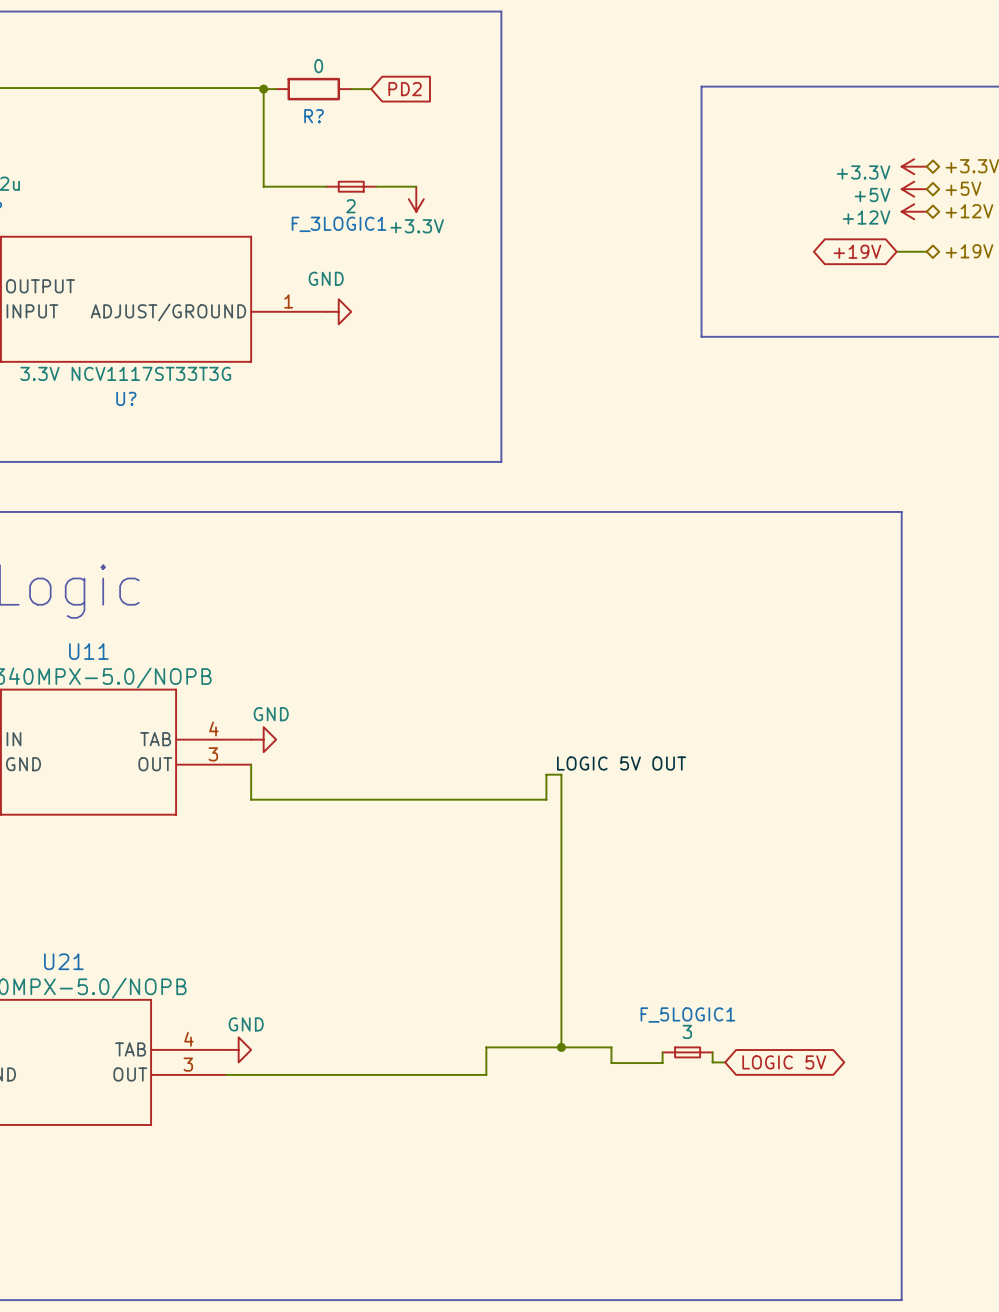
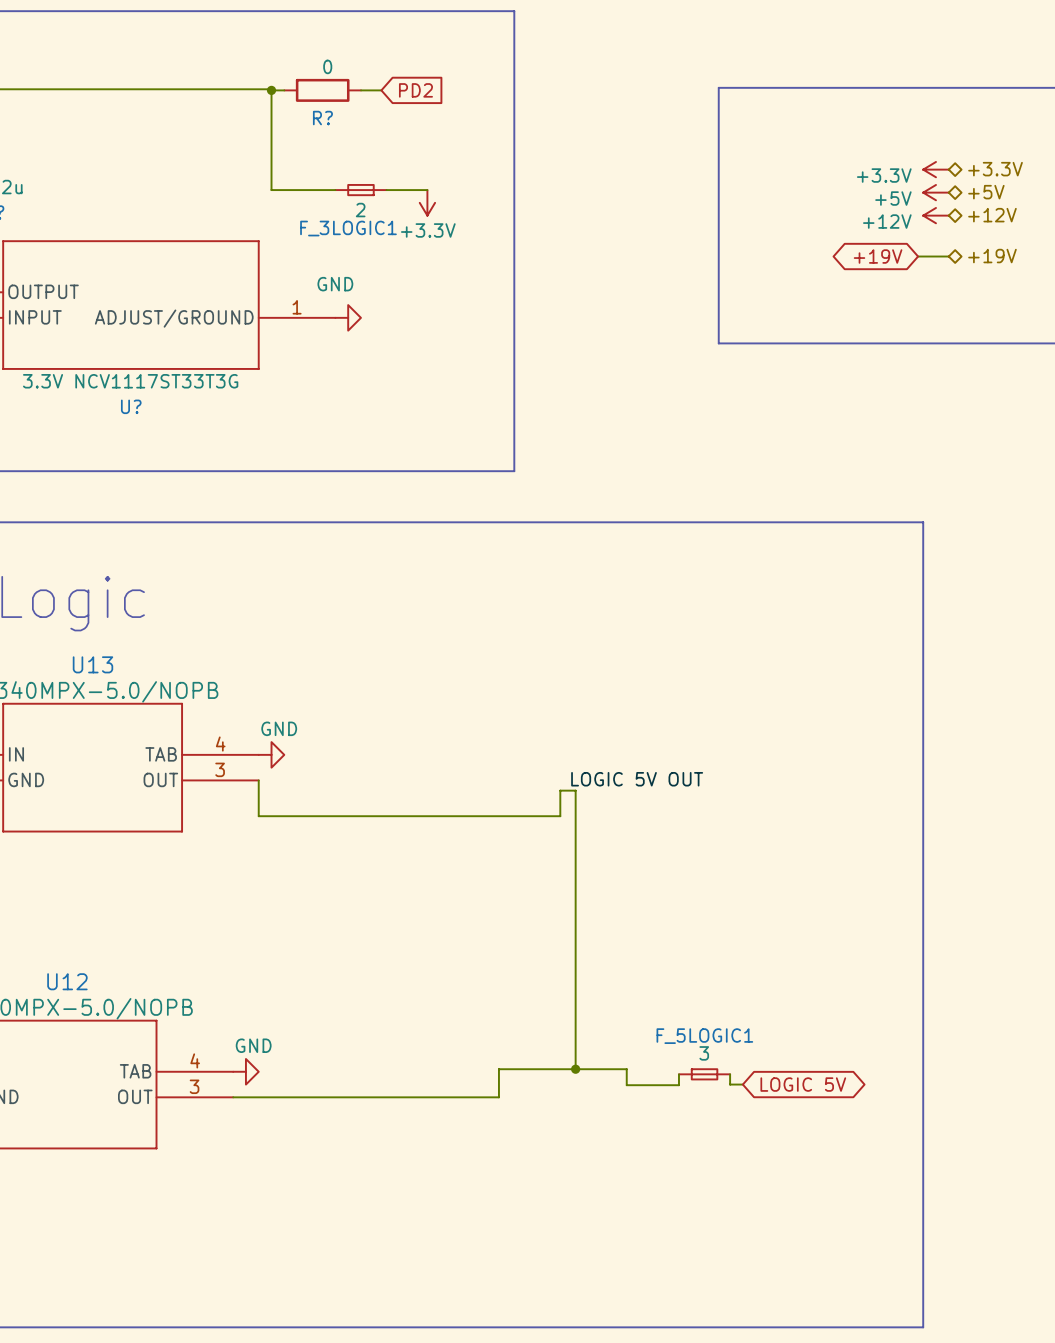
U11 name: U11 (88, 651) -> U13 (92, 664)
U21 name: U21 (63, 961) -> U12 (67, 981)

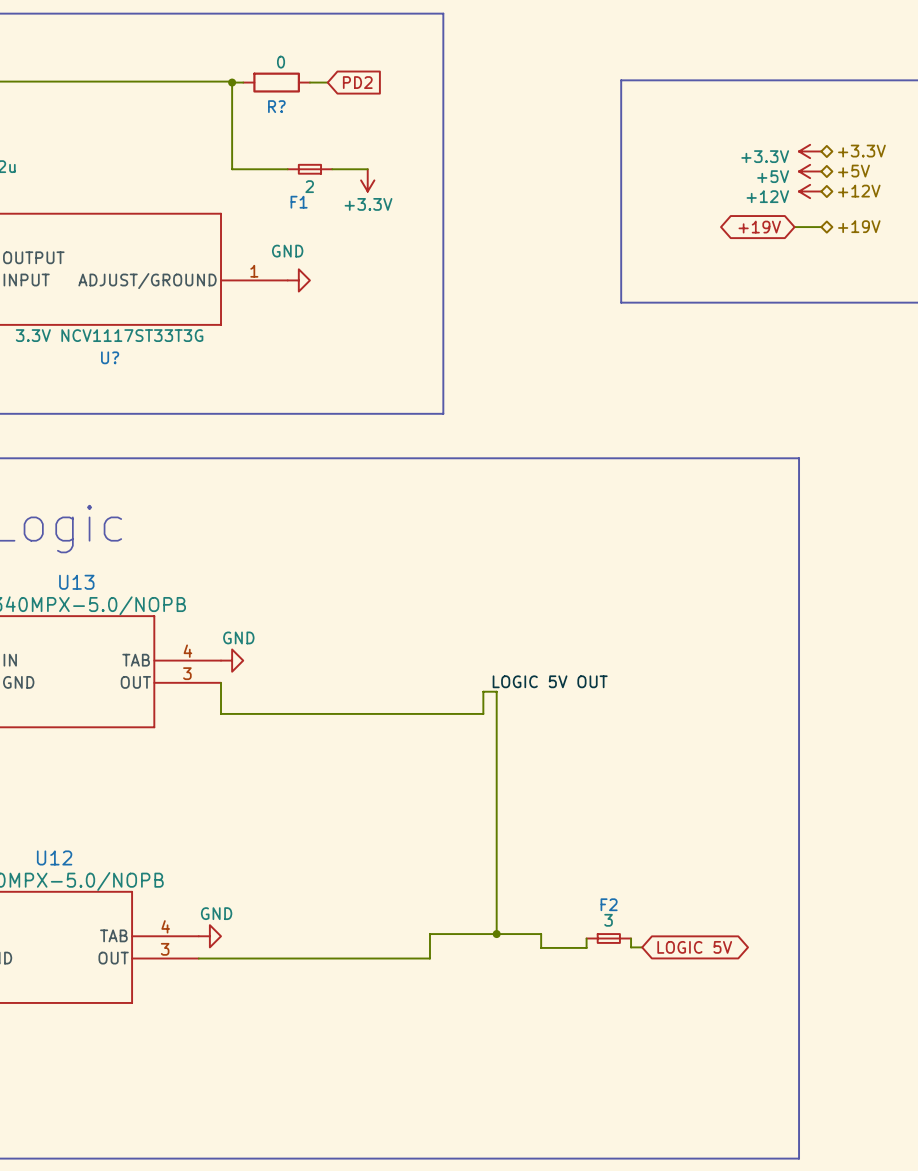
F_3LOGIC1 name: F_3LOGIC1 (348, 228) -> F1 (299, 202)
F_5LOGIC1 name: F_5LOGIC1 (704, 1036) -> F2 (609, 904)

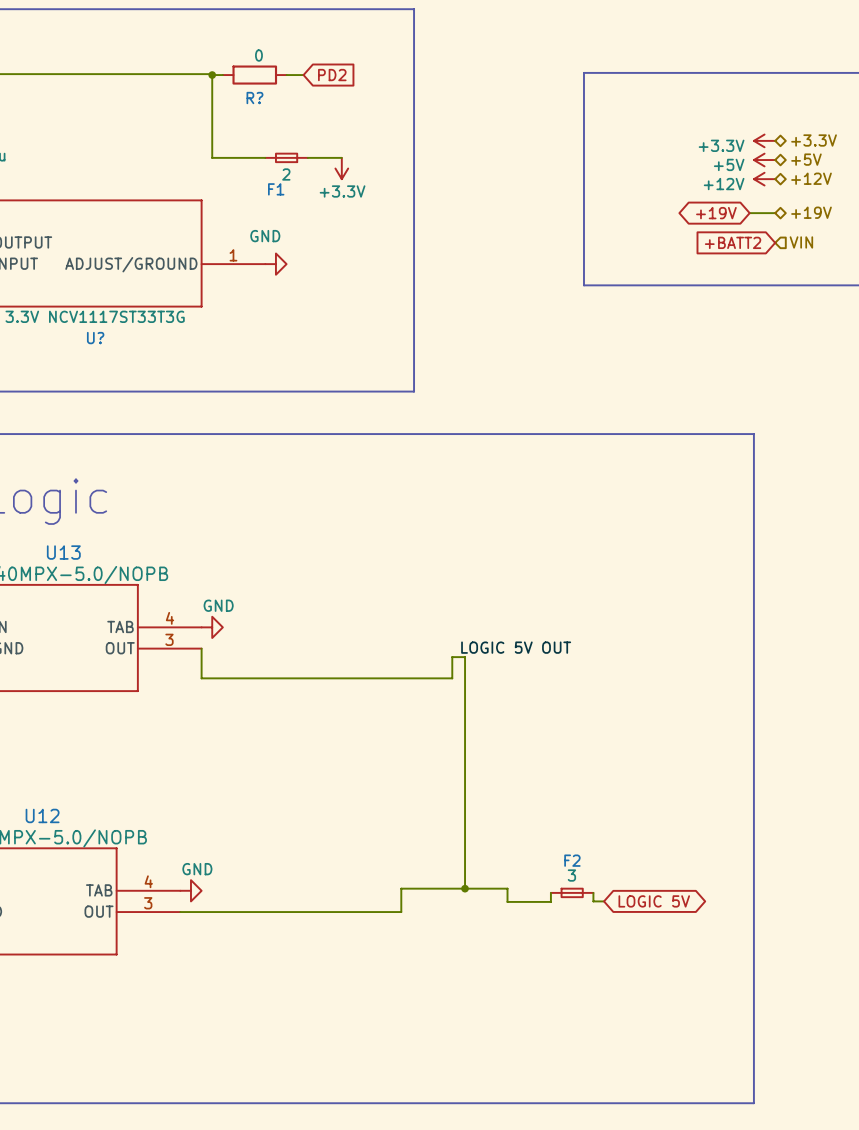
hierarchical label: none -> VIN (801, 242)
global label: none -> +BATT2 (733, 242)

